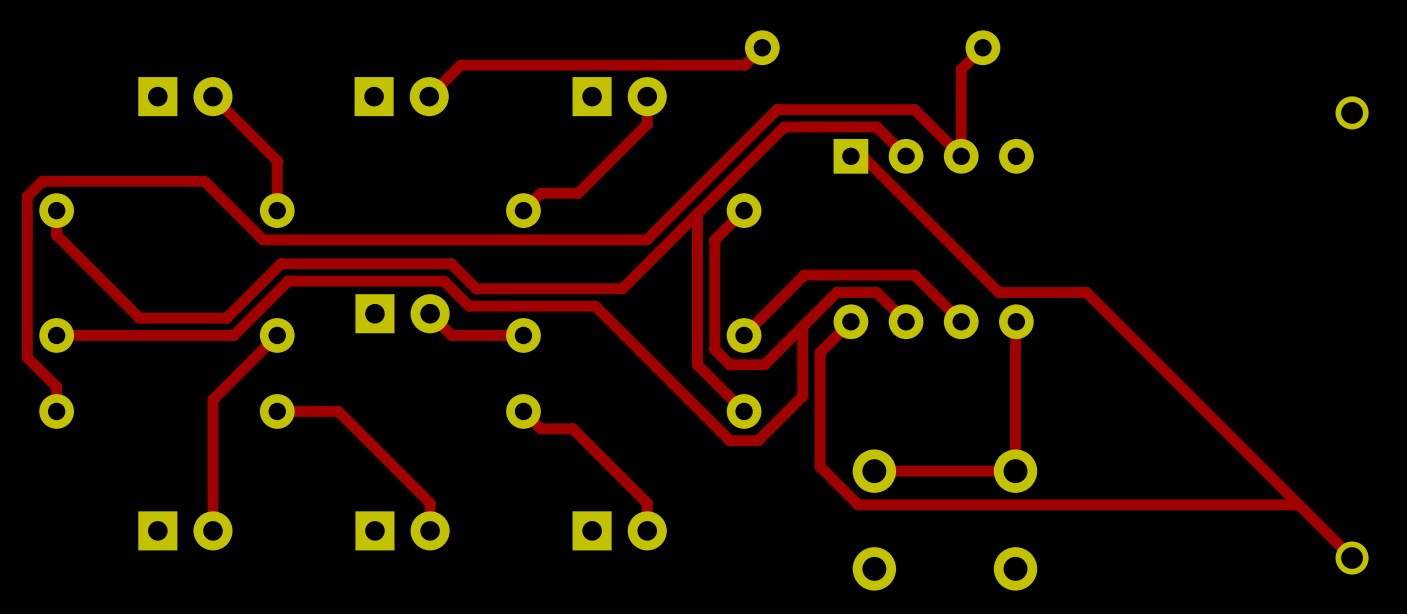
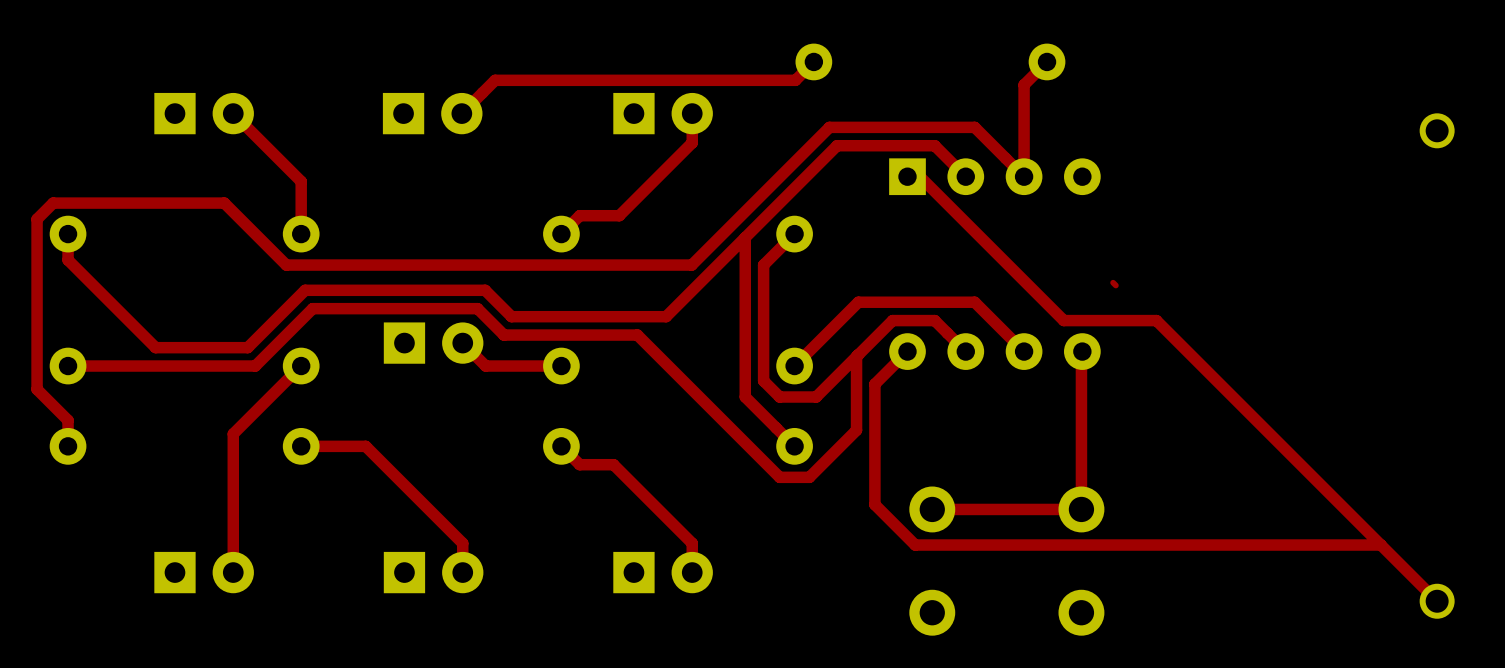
track: none -> (1113, 282) (1115, 285)

